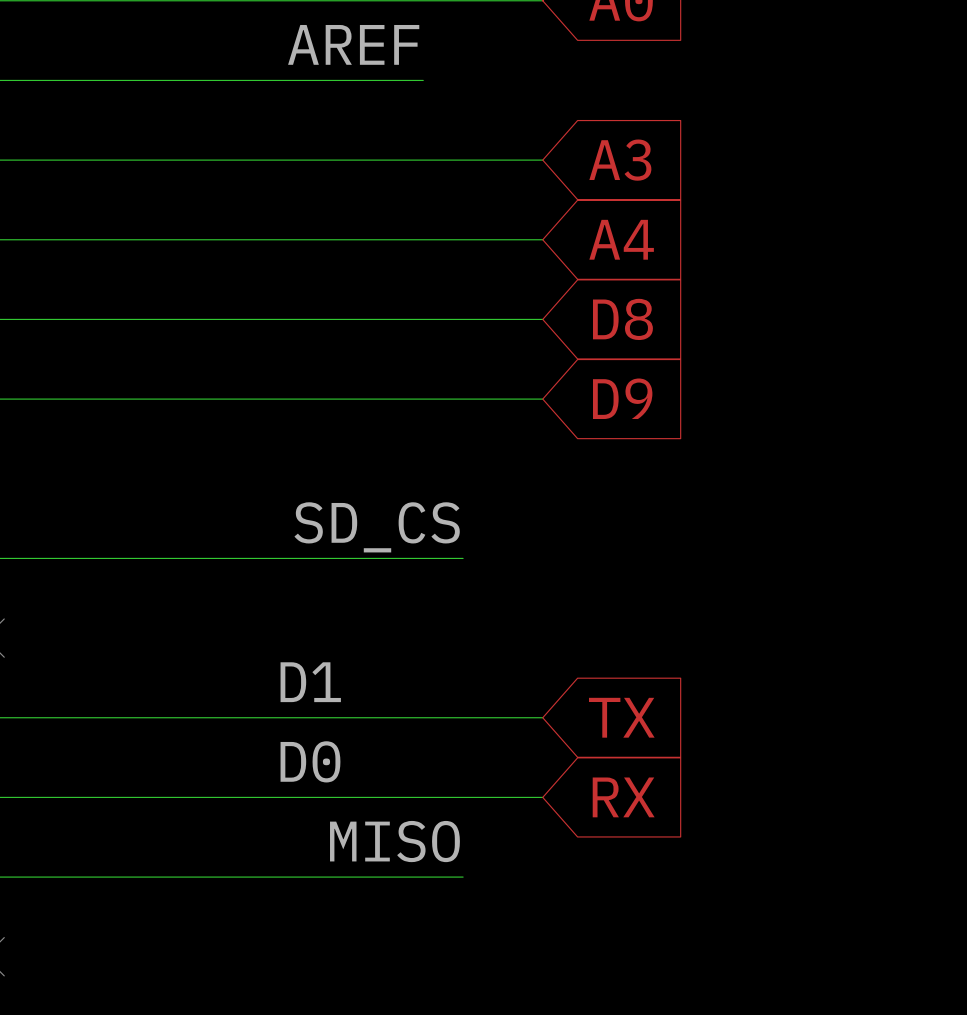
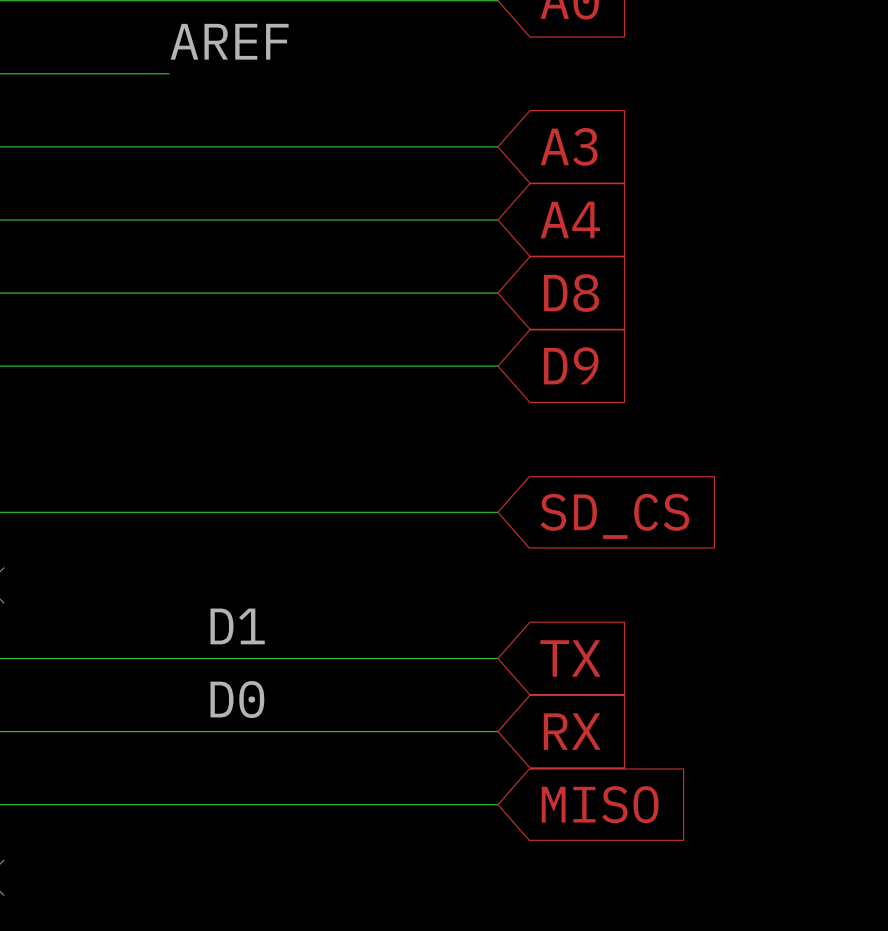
label position: AREF (353, 44) -> AREF (229, 41)
wire: (184, 80) (423, 80) -> none
label: SD_CS (377, 527) -> none
wire: none -> (424, 512) (497, 512)
global label: none -> SD_CS (614, 516)
label position: D1 (310, 682) -> D1 (237, 626)
label position: D0 (310, 761) -> D0 (237, 699)
label: MISO (394, 841) -> none
wire: none -> (424, 804) (497, 804)
global label: none -> MISO (600, 804)

